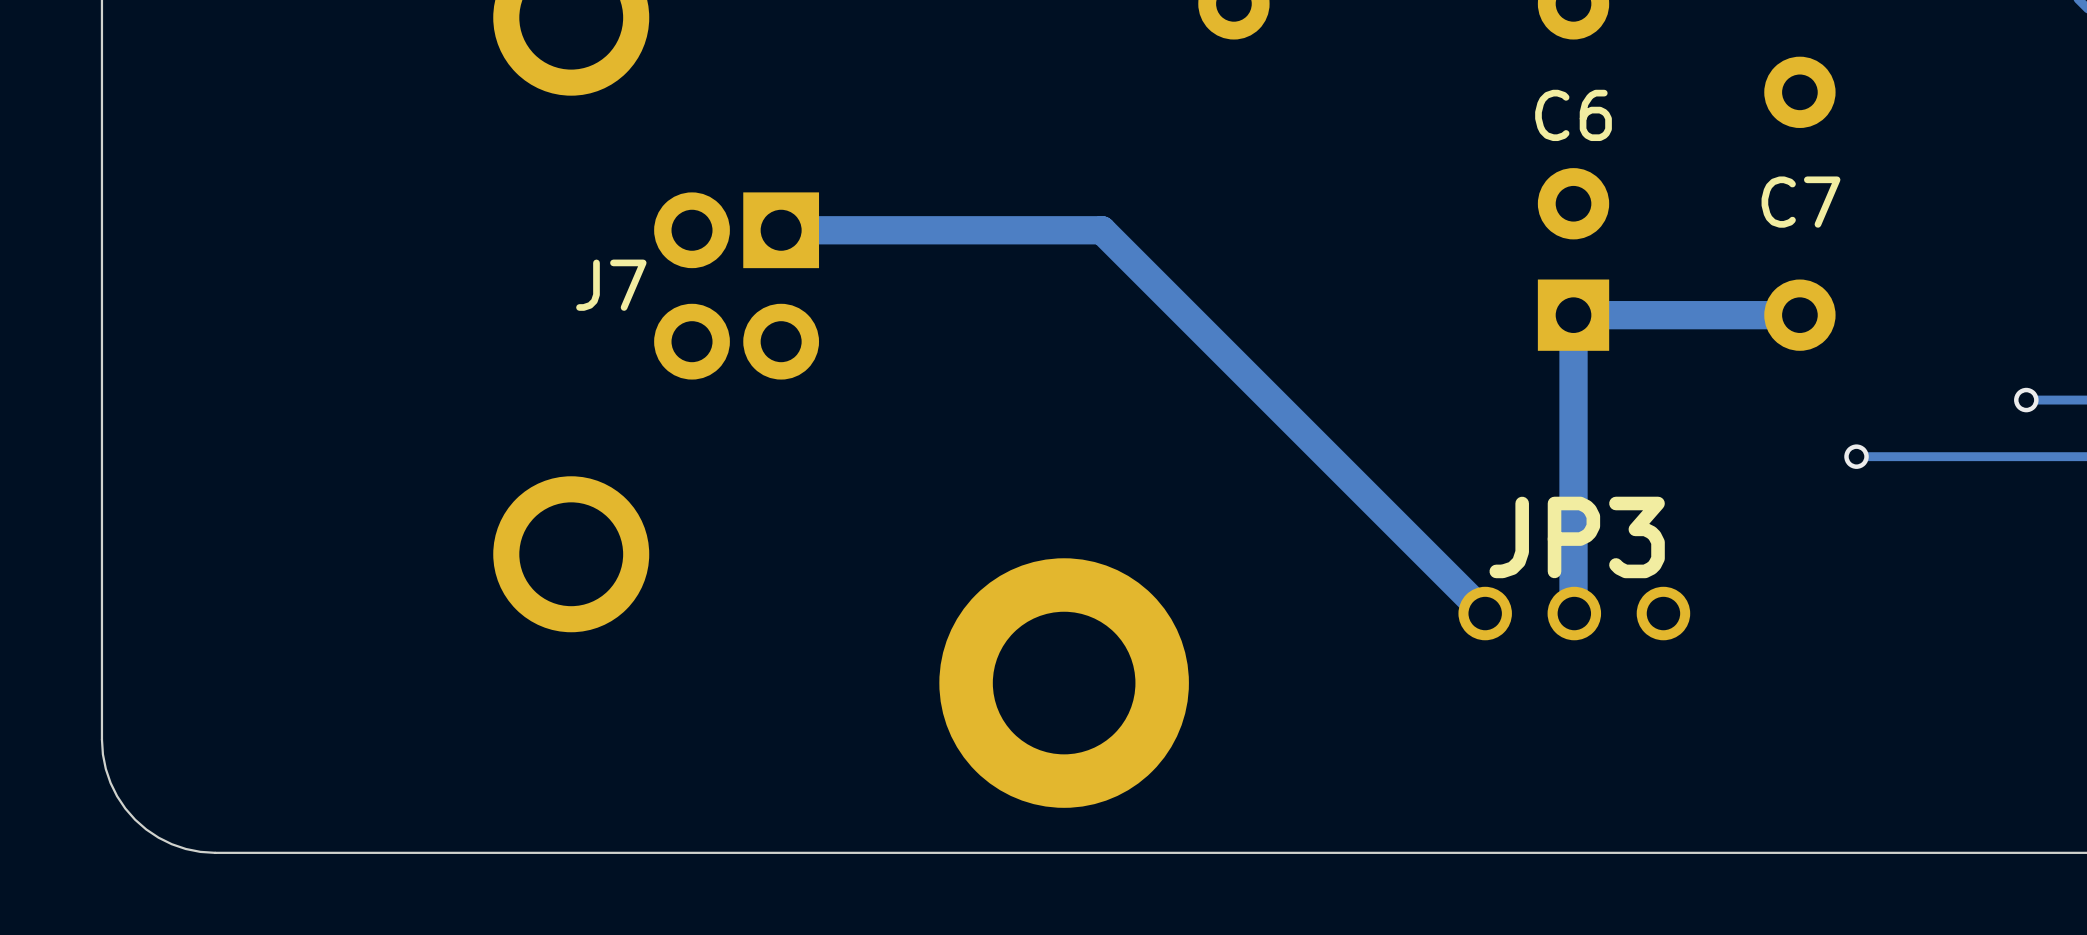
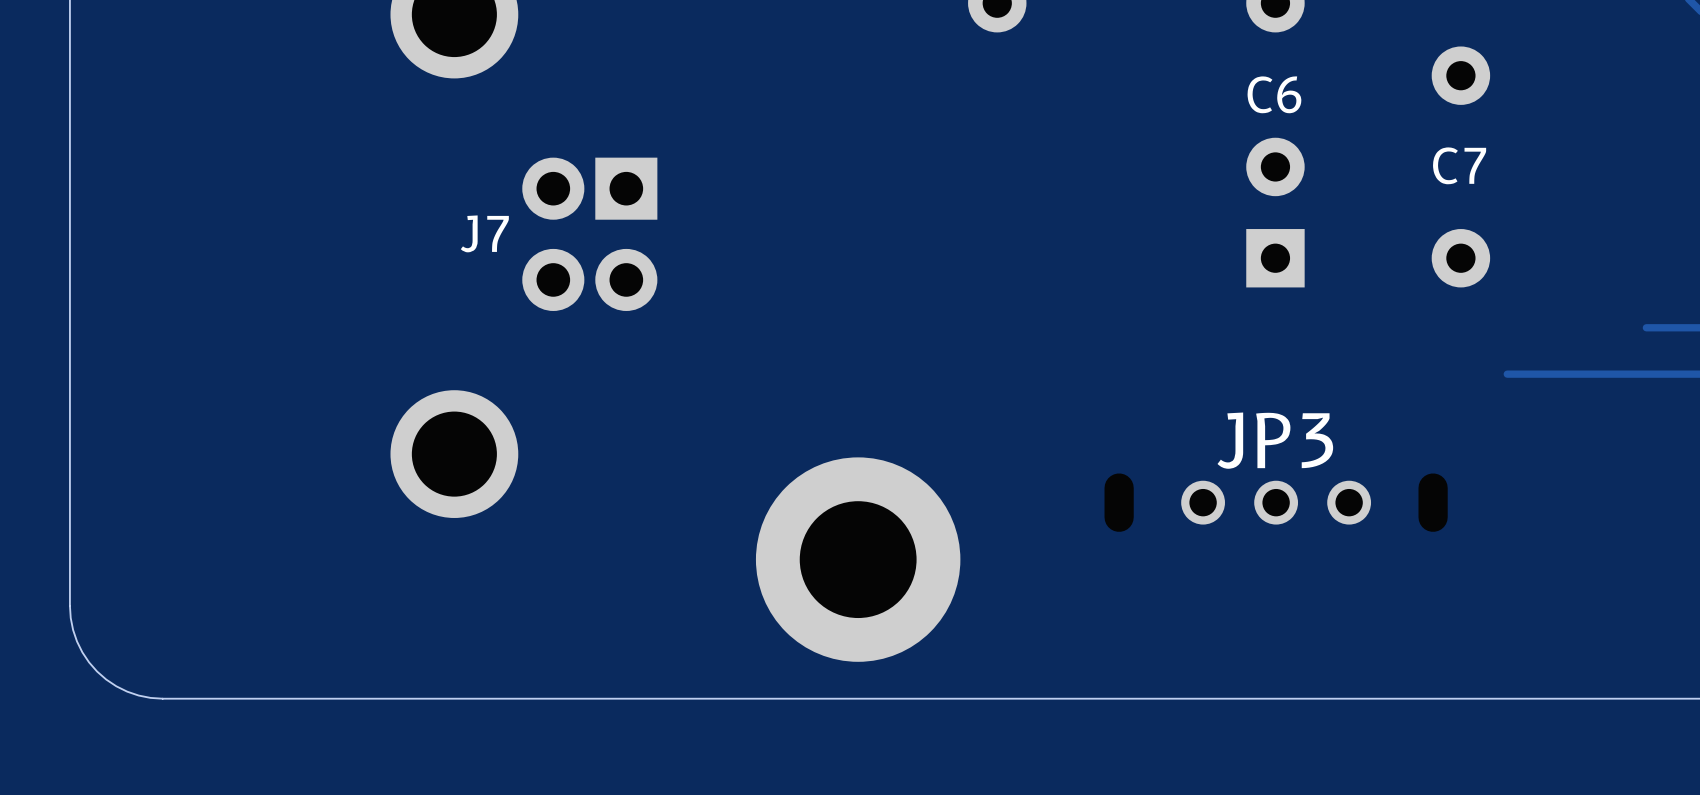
track: (781, 230) (1101, 230) (1485, 613) -> none
track: (1799, 315) (1573, 315) (1574, 613) -> none
via: (2026, 400) -> none
via: (1856, 456) -> none

